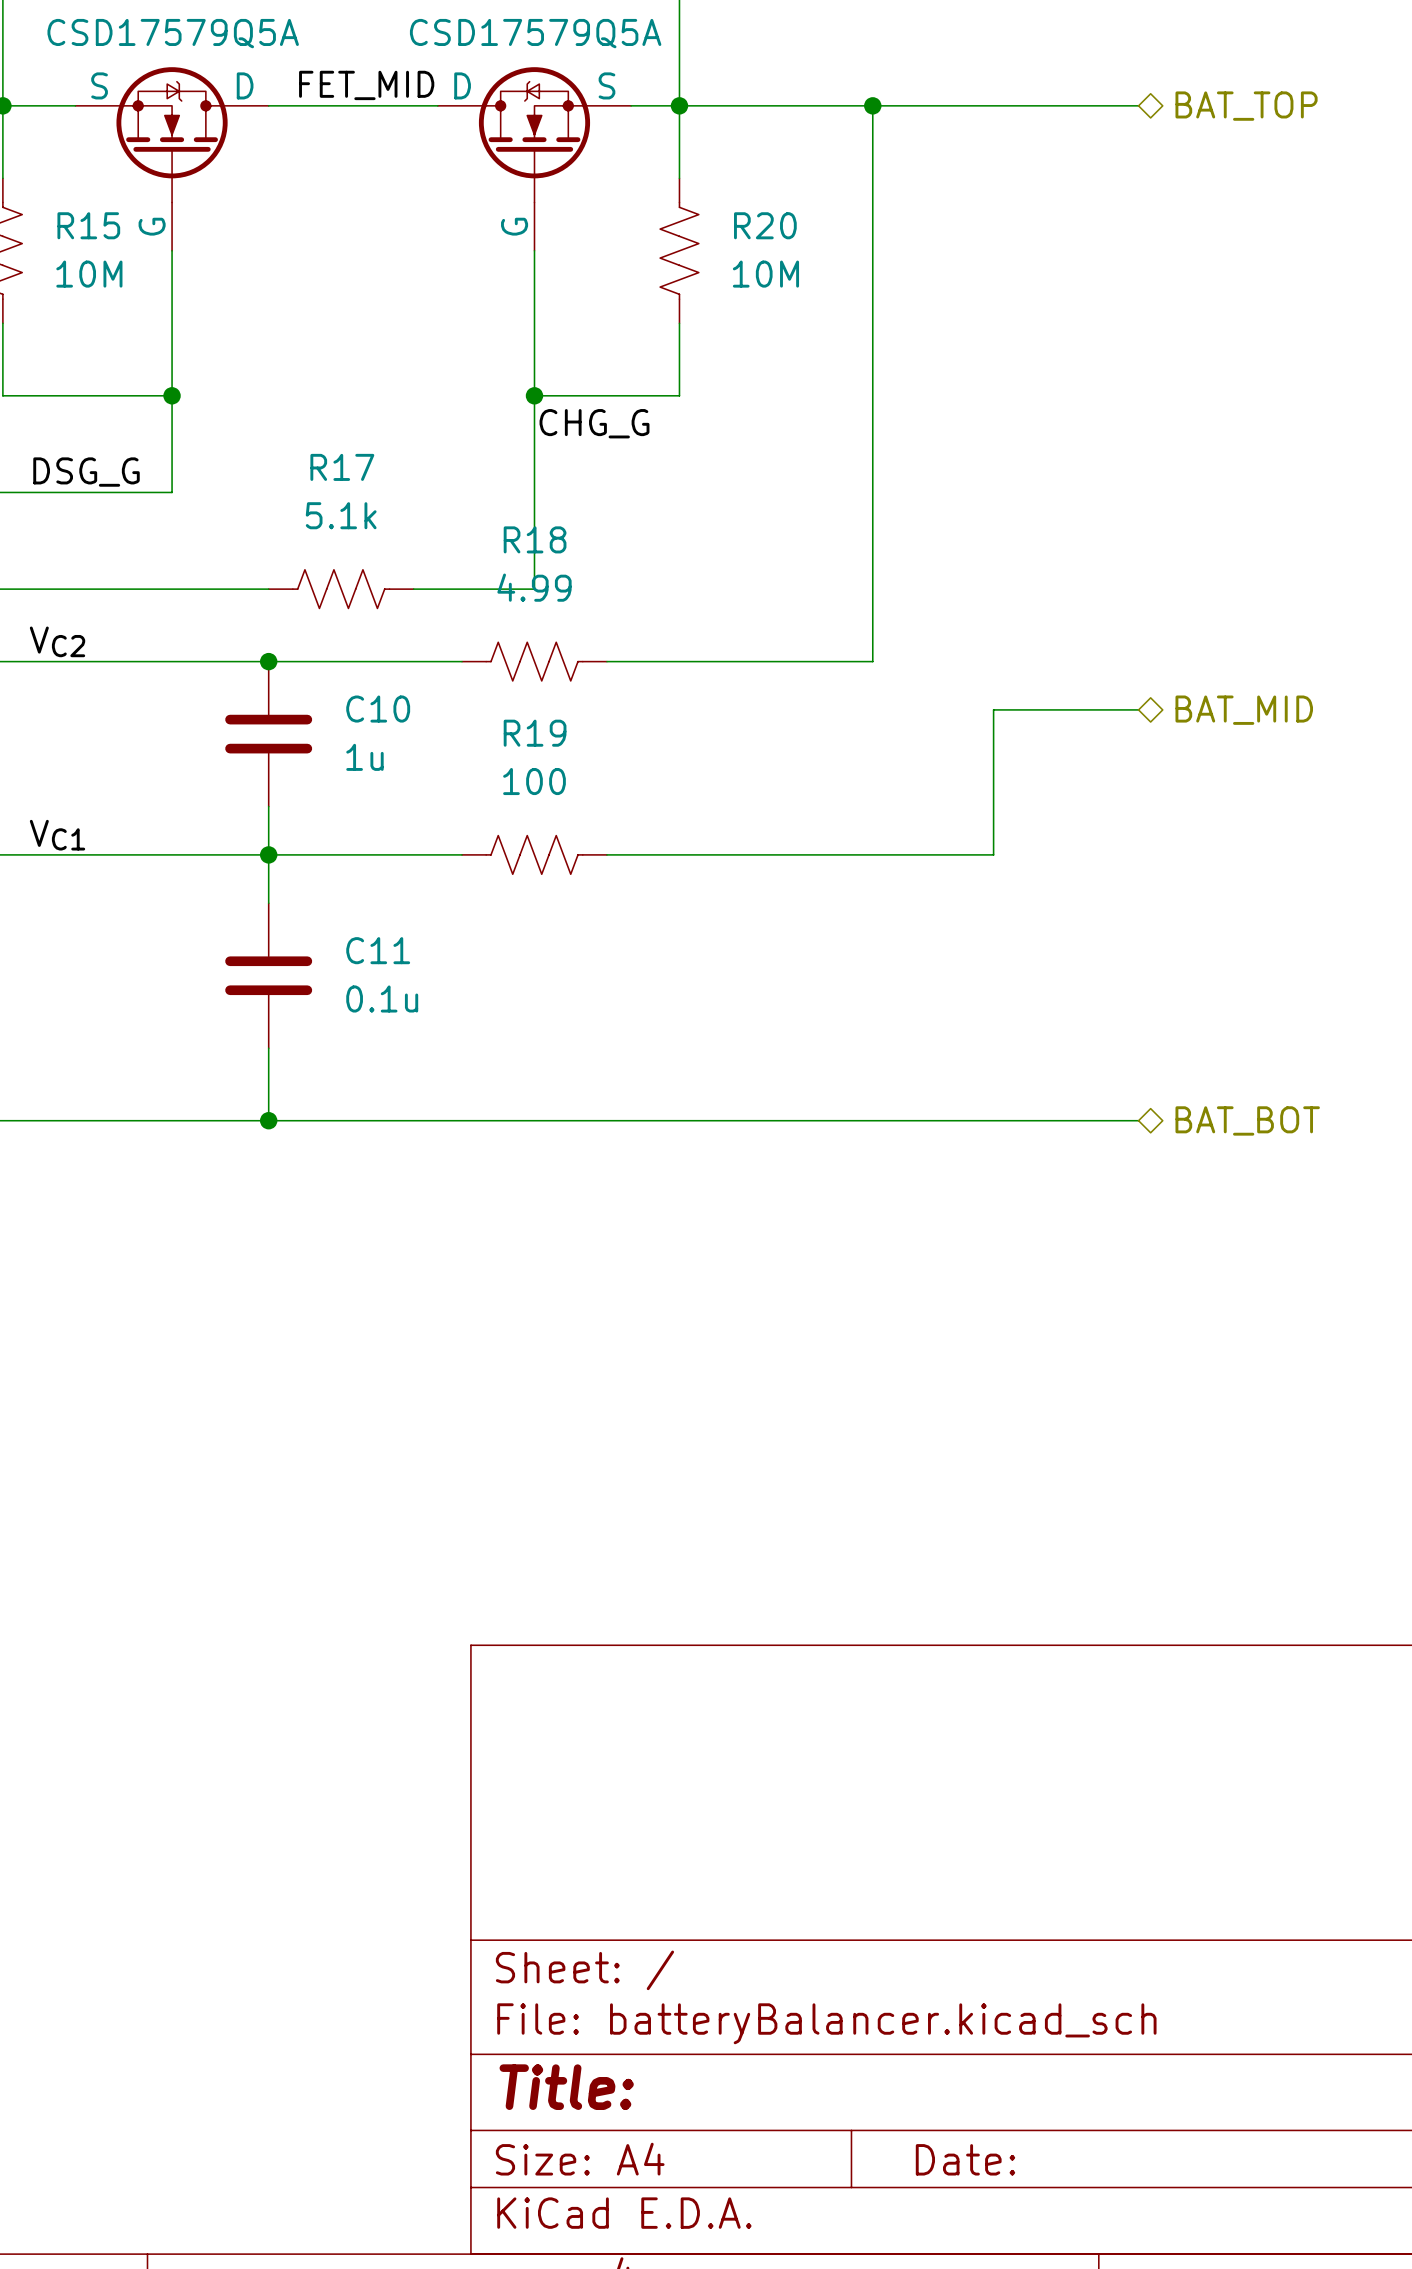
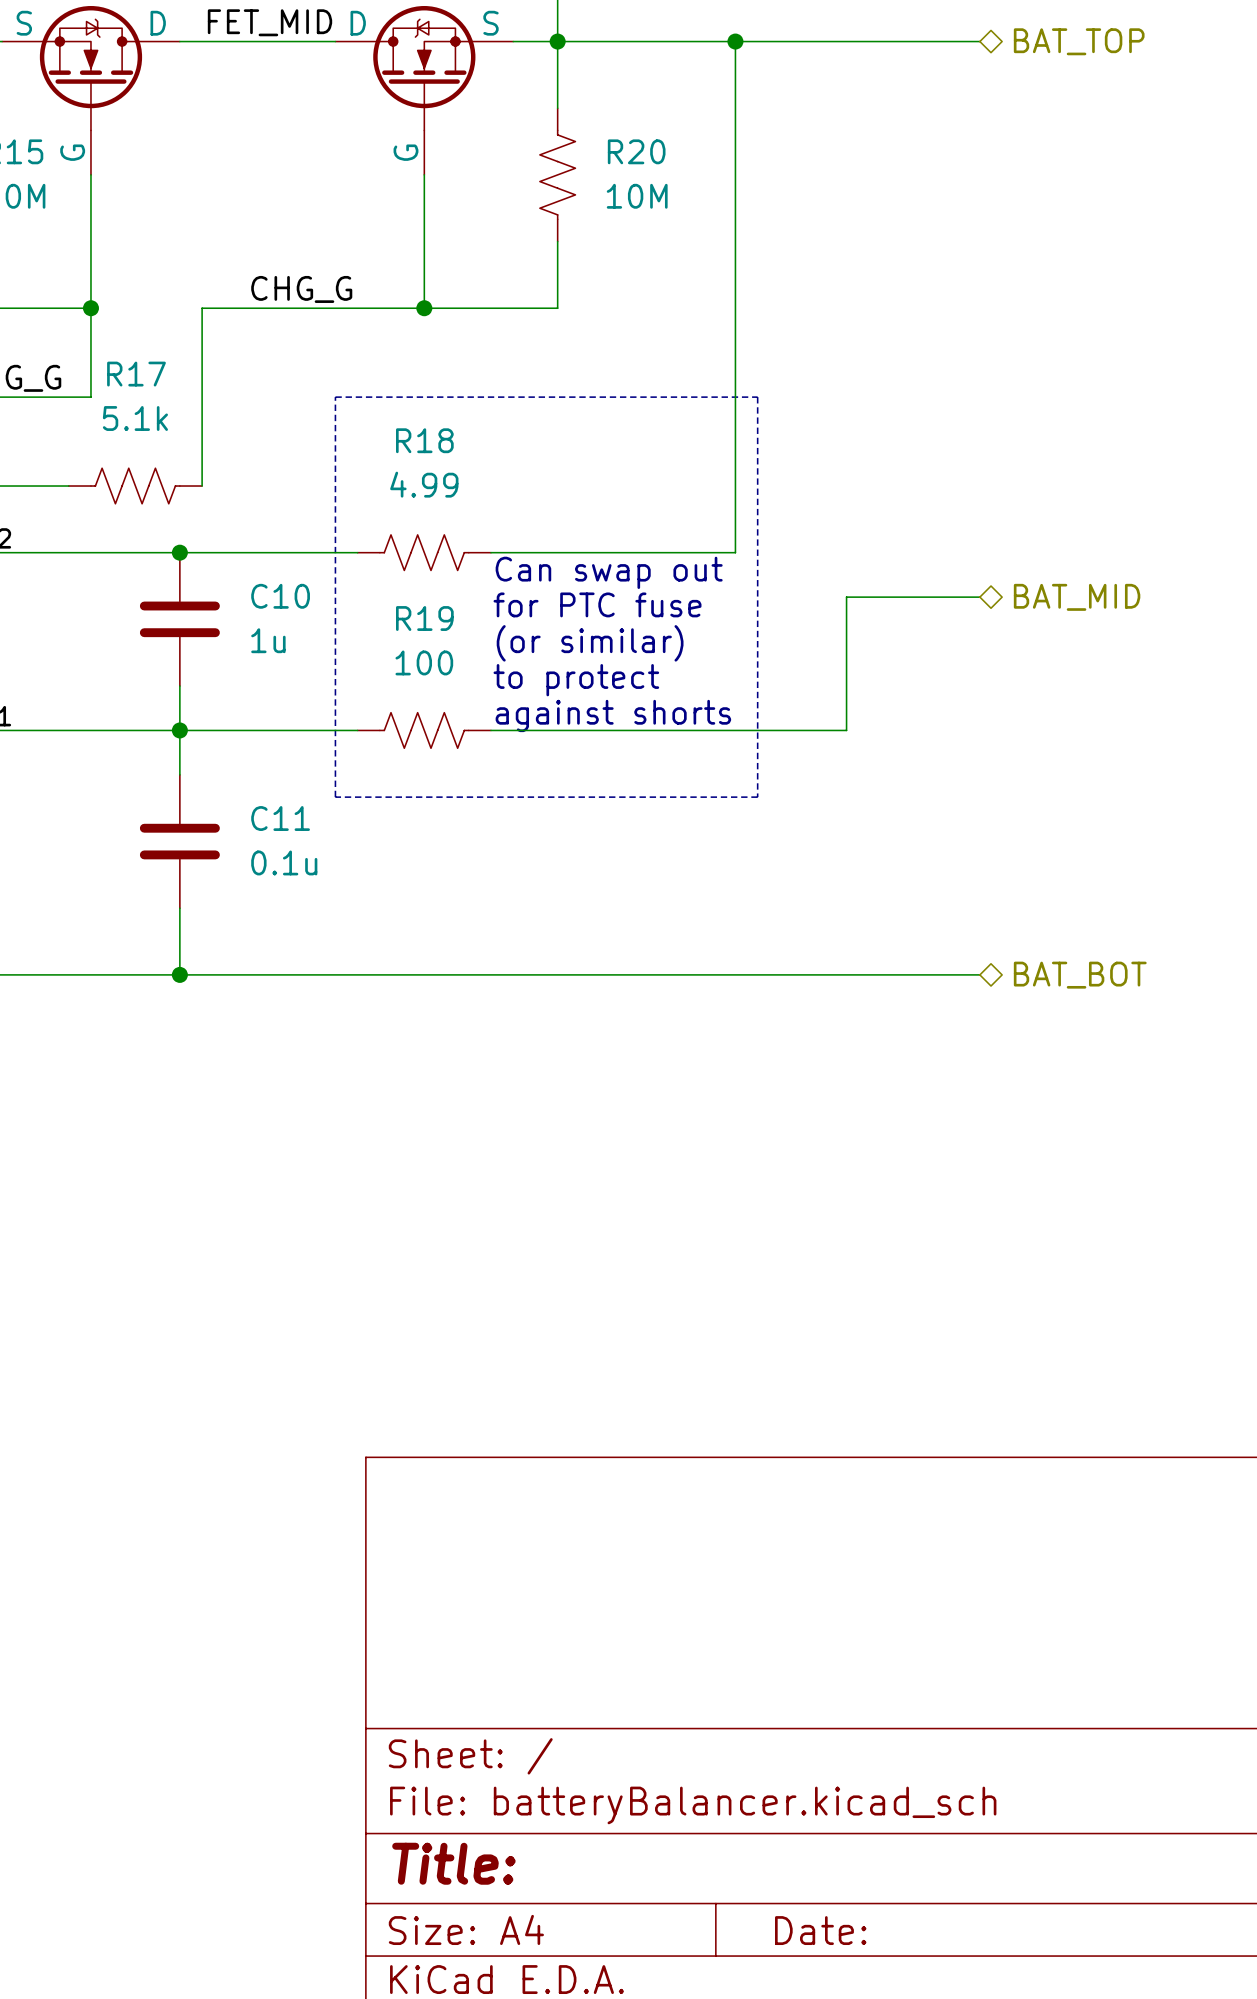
wire: (534, 395) (534, 589) (413, 589) -> (424, 308) (202, 308) (202, 486)
label position: CHG_G (594, 423) -> CHG_G (301, 289)
line: none -> (335, 397) (757, 397) (757, 797) (335, 797) (335, 397)
wire: (147, 589) (268, 589) -> none
R17 position: (341, 589) -> (135, 486)
text: none -> Can swap out (609, 572)
text: none -> for PTC fuse (597, 604)
text: none -> (or similar) (590, 643)
text: none -> to protect (576, 680)
text: none -> against shorts (613, 715)

